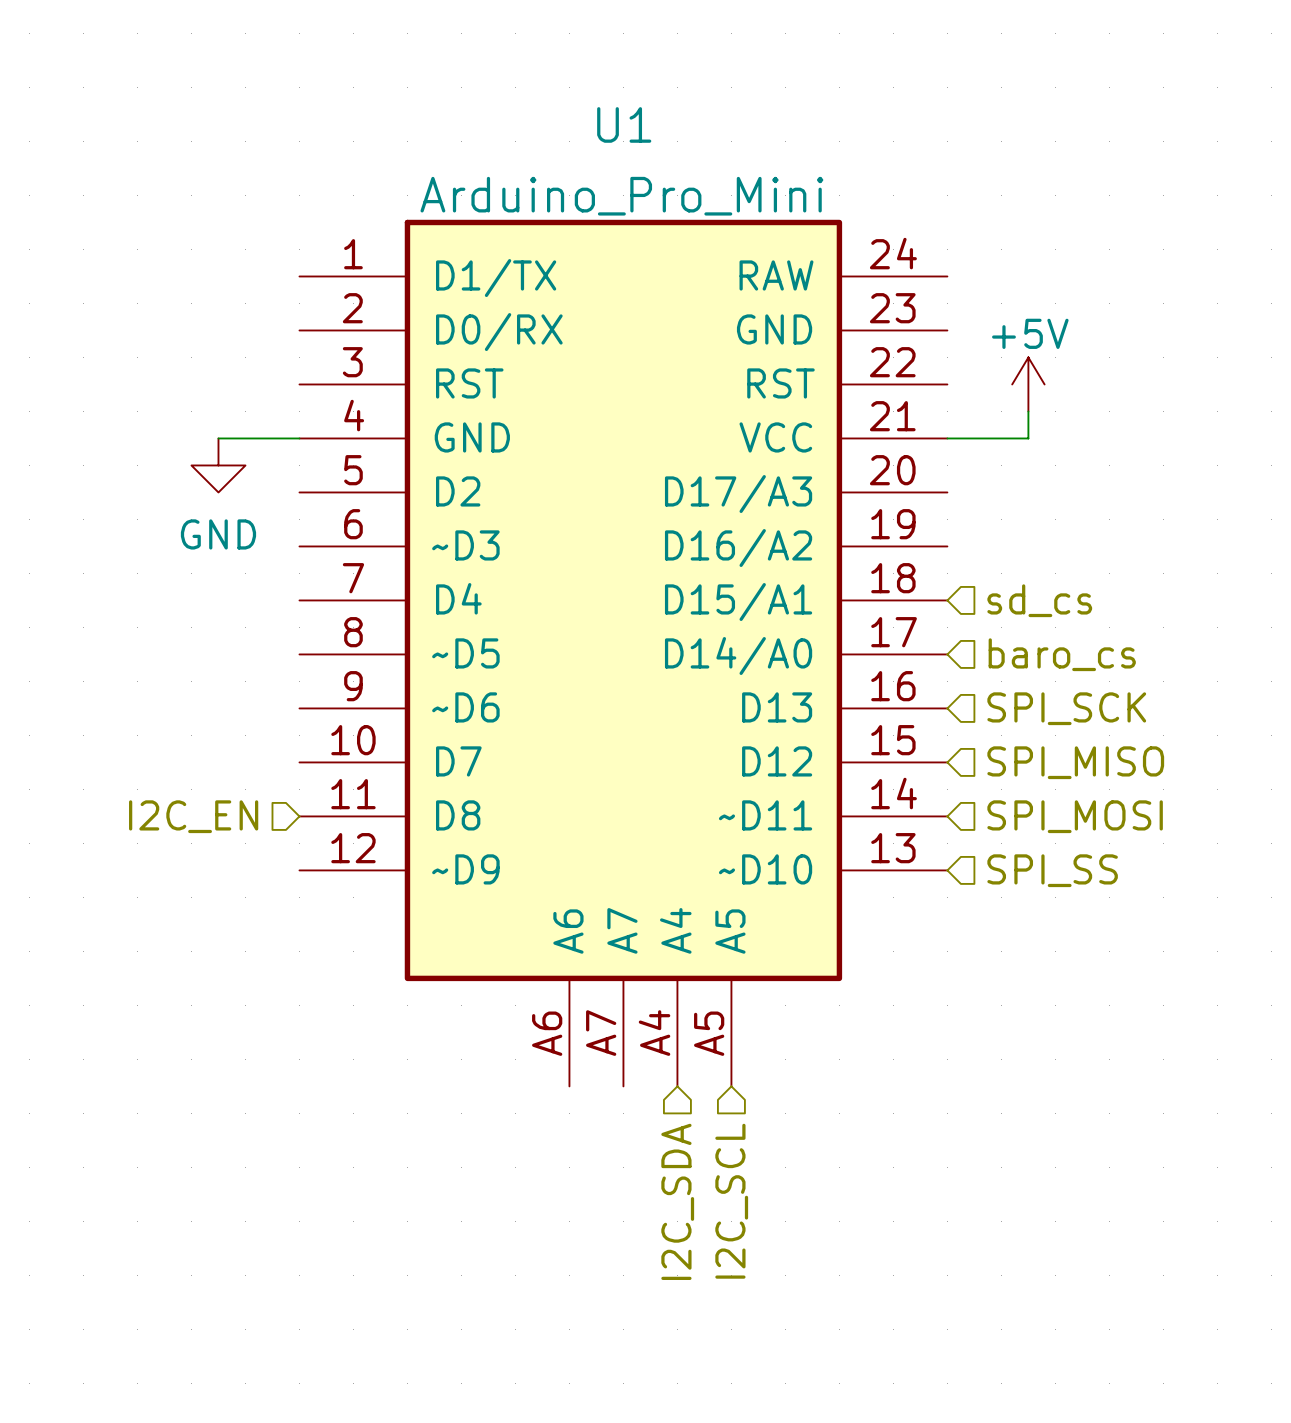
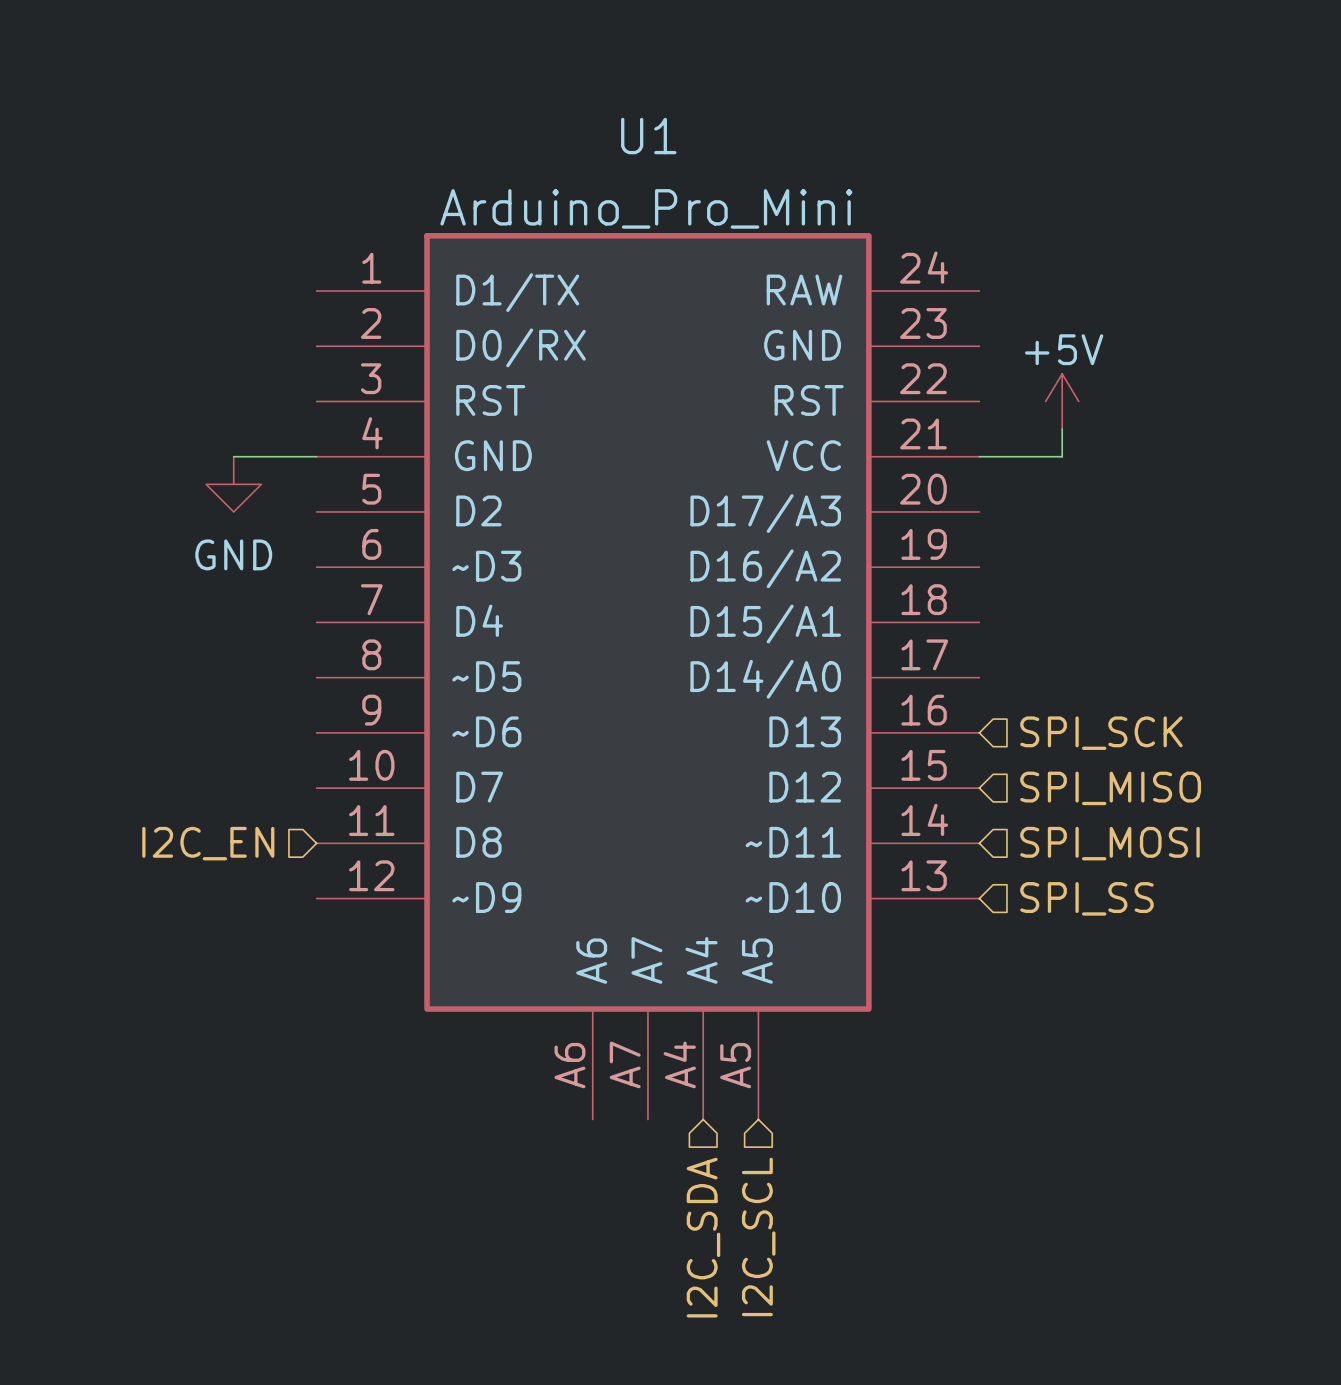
hierarchical label: sd_cs (1039, 600) -> none
hierarchical label: baro_cs (1062, 654) -> none

